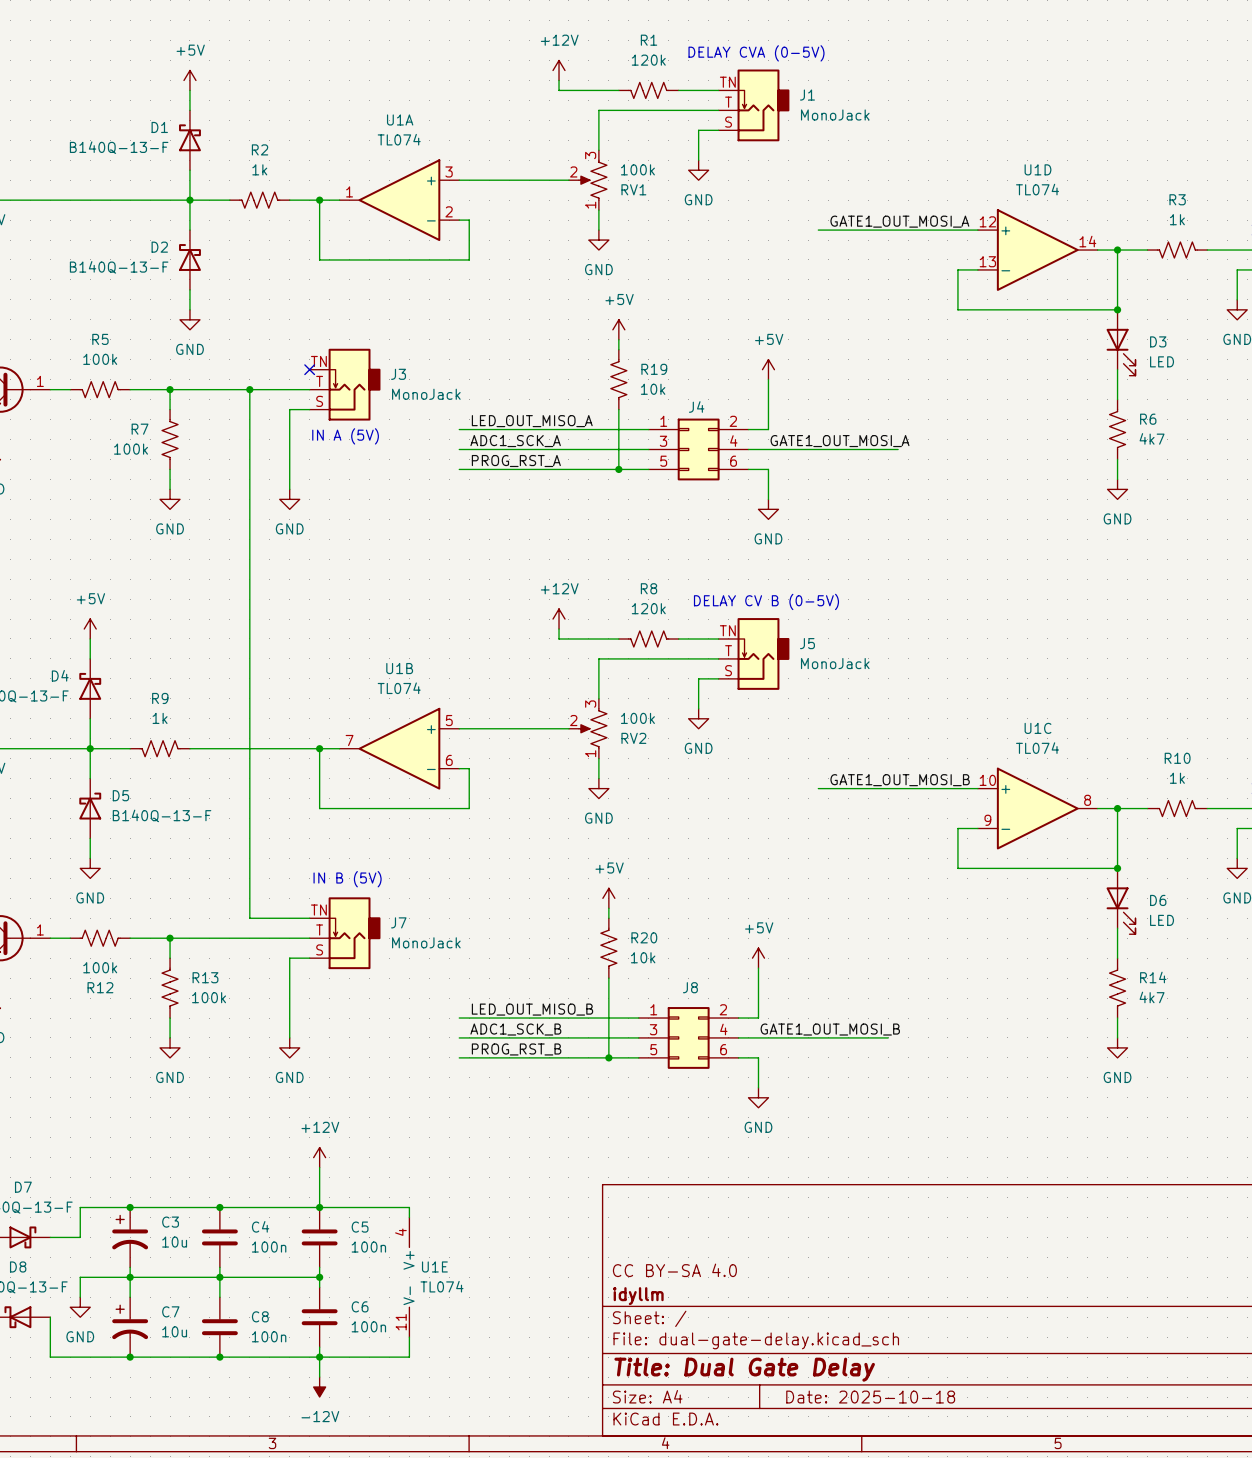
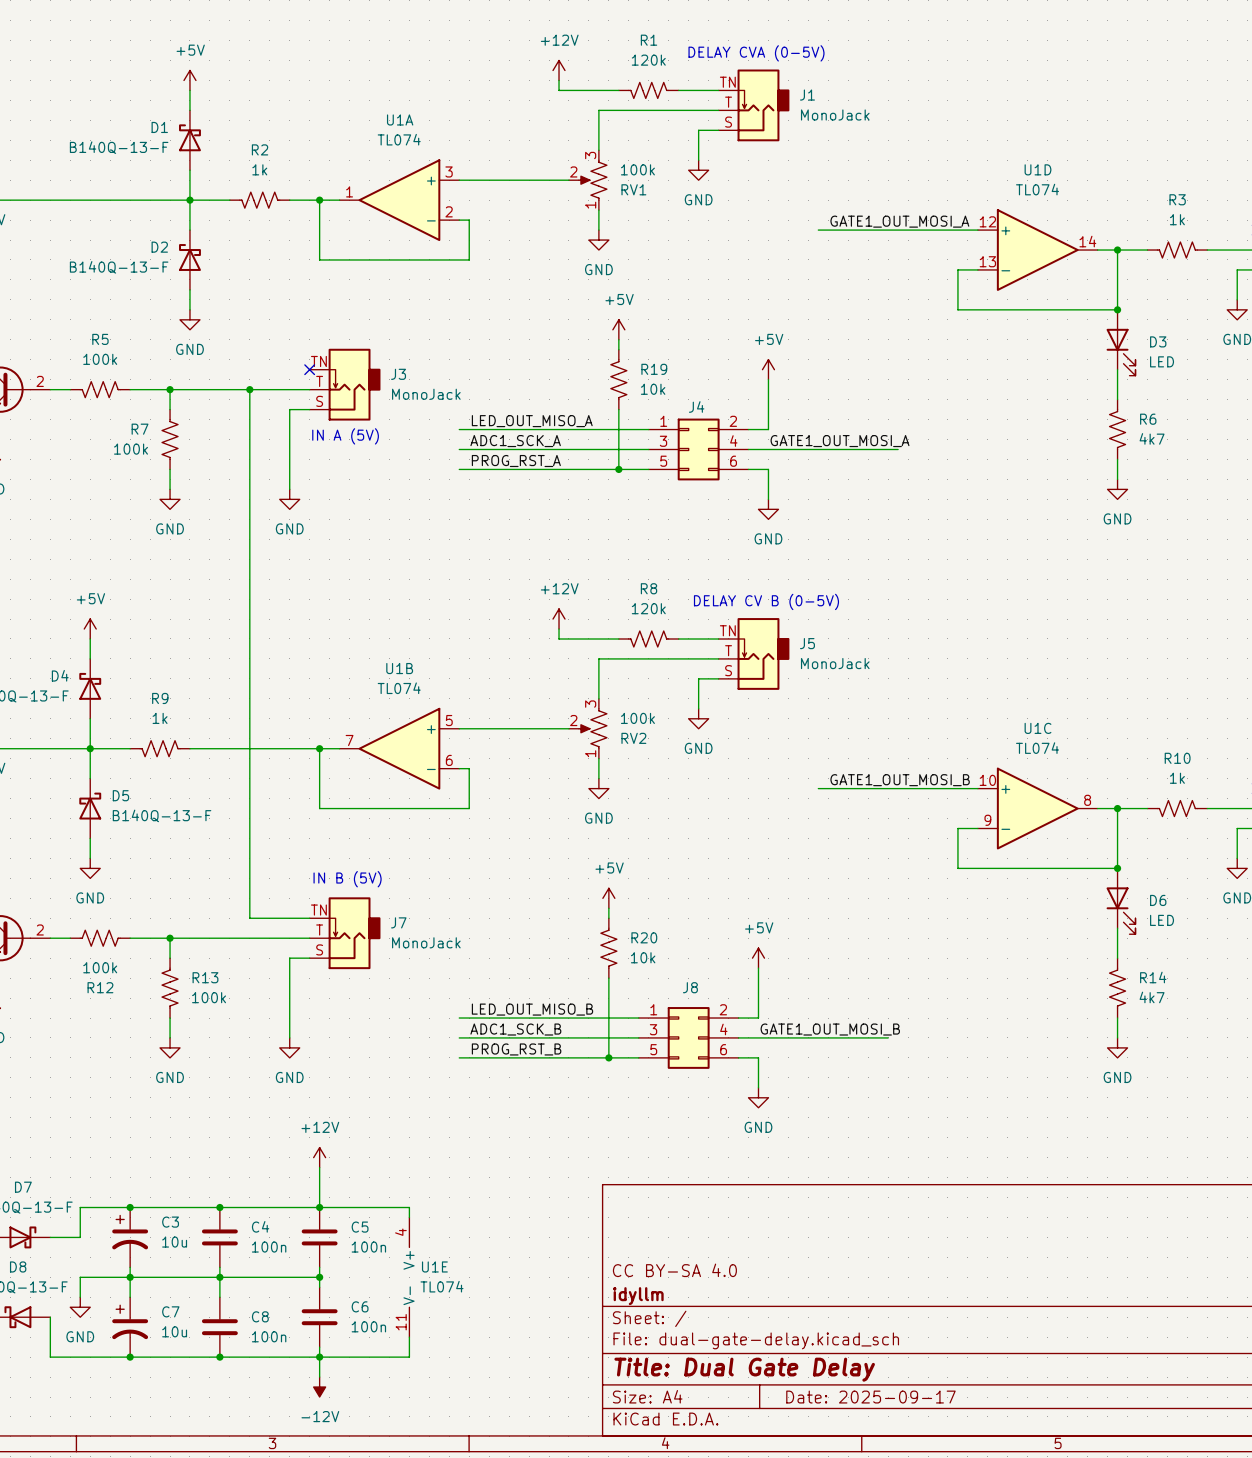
part pin number: 1 (40, 381) -> 2 (40, 381)
part pin number: 1 (40, 929) -> 2 (40, 929)
title block: Date: 2025-10-18 (870, 1397) -> Date: 2025-09-17 (870, 1397)

